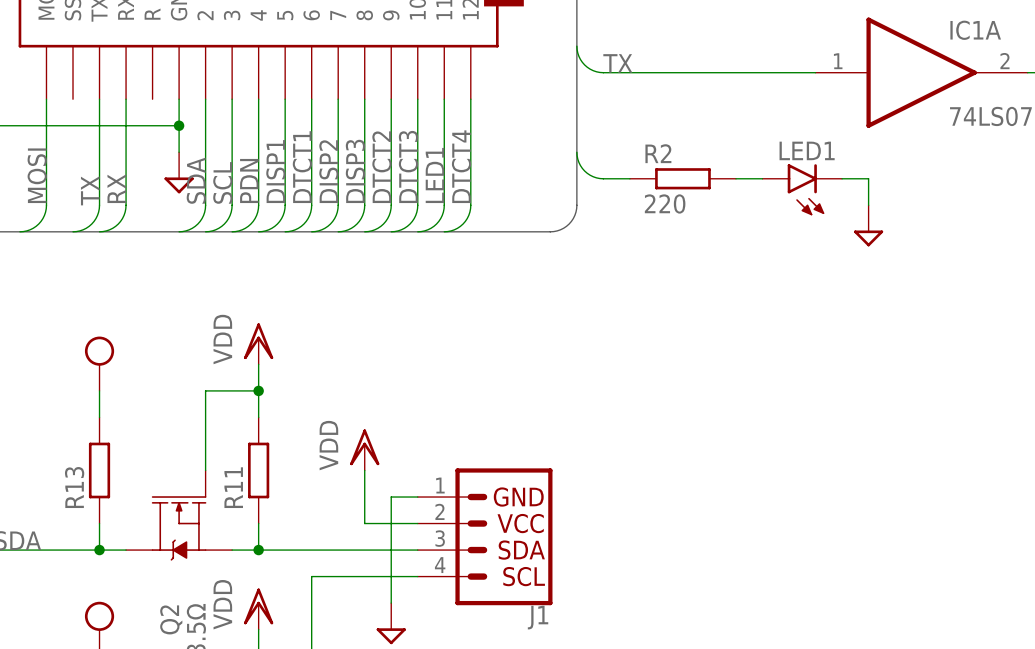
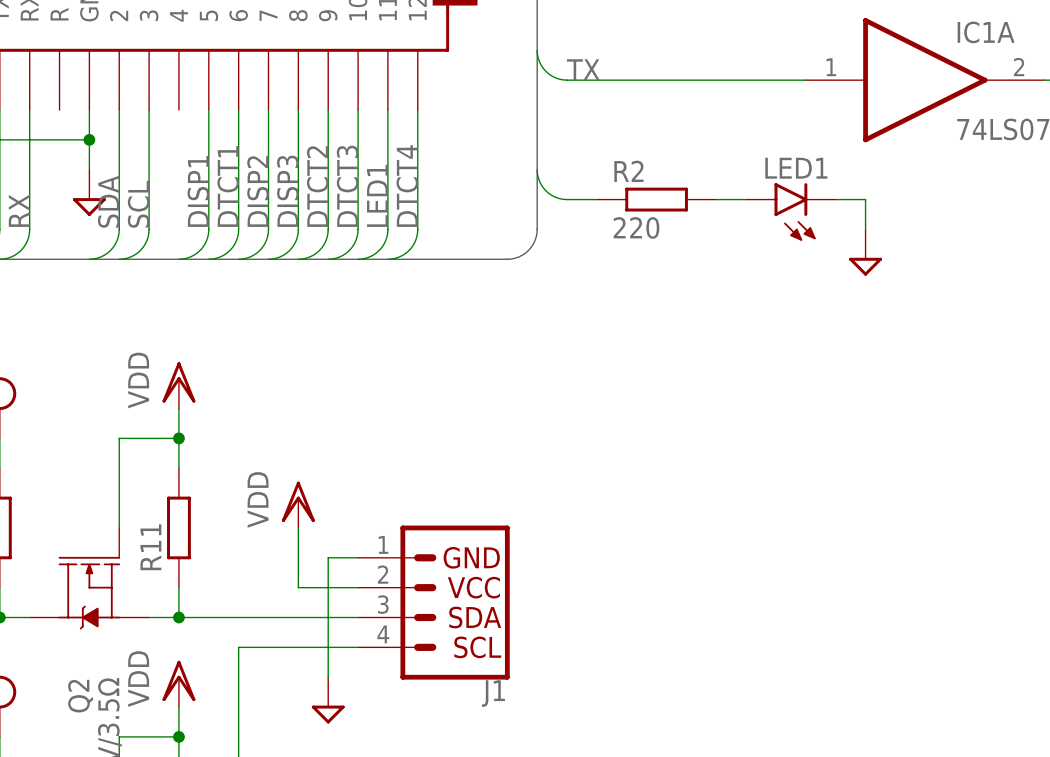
wire: (258, 99) (257, 212) (248, 226) (232, 231) -> none
label: PDN (249, 180) -> none

